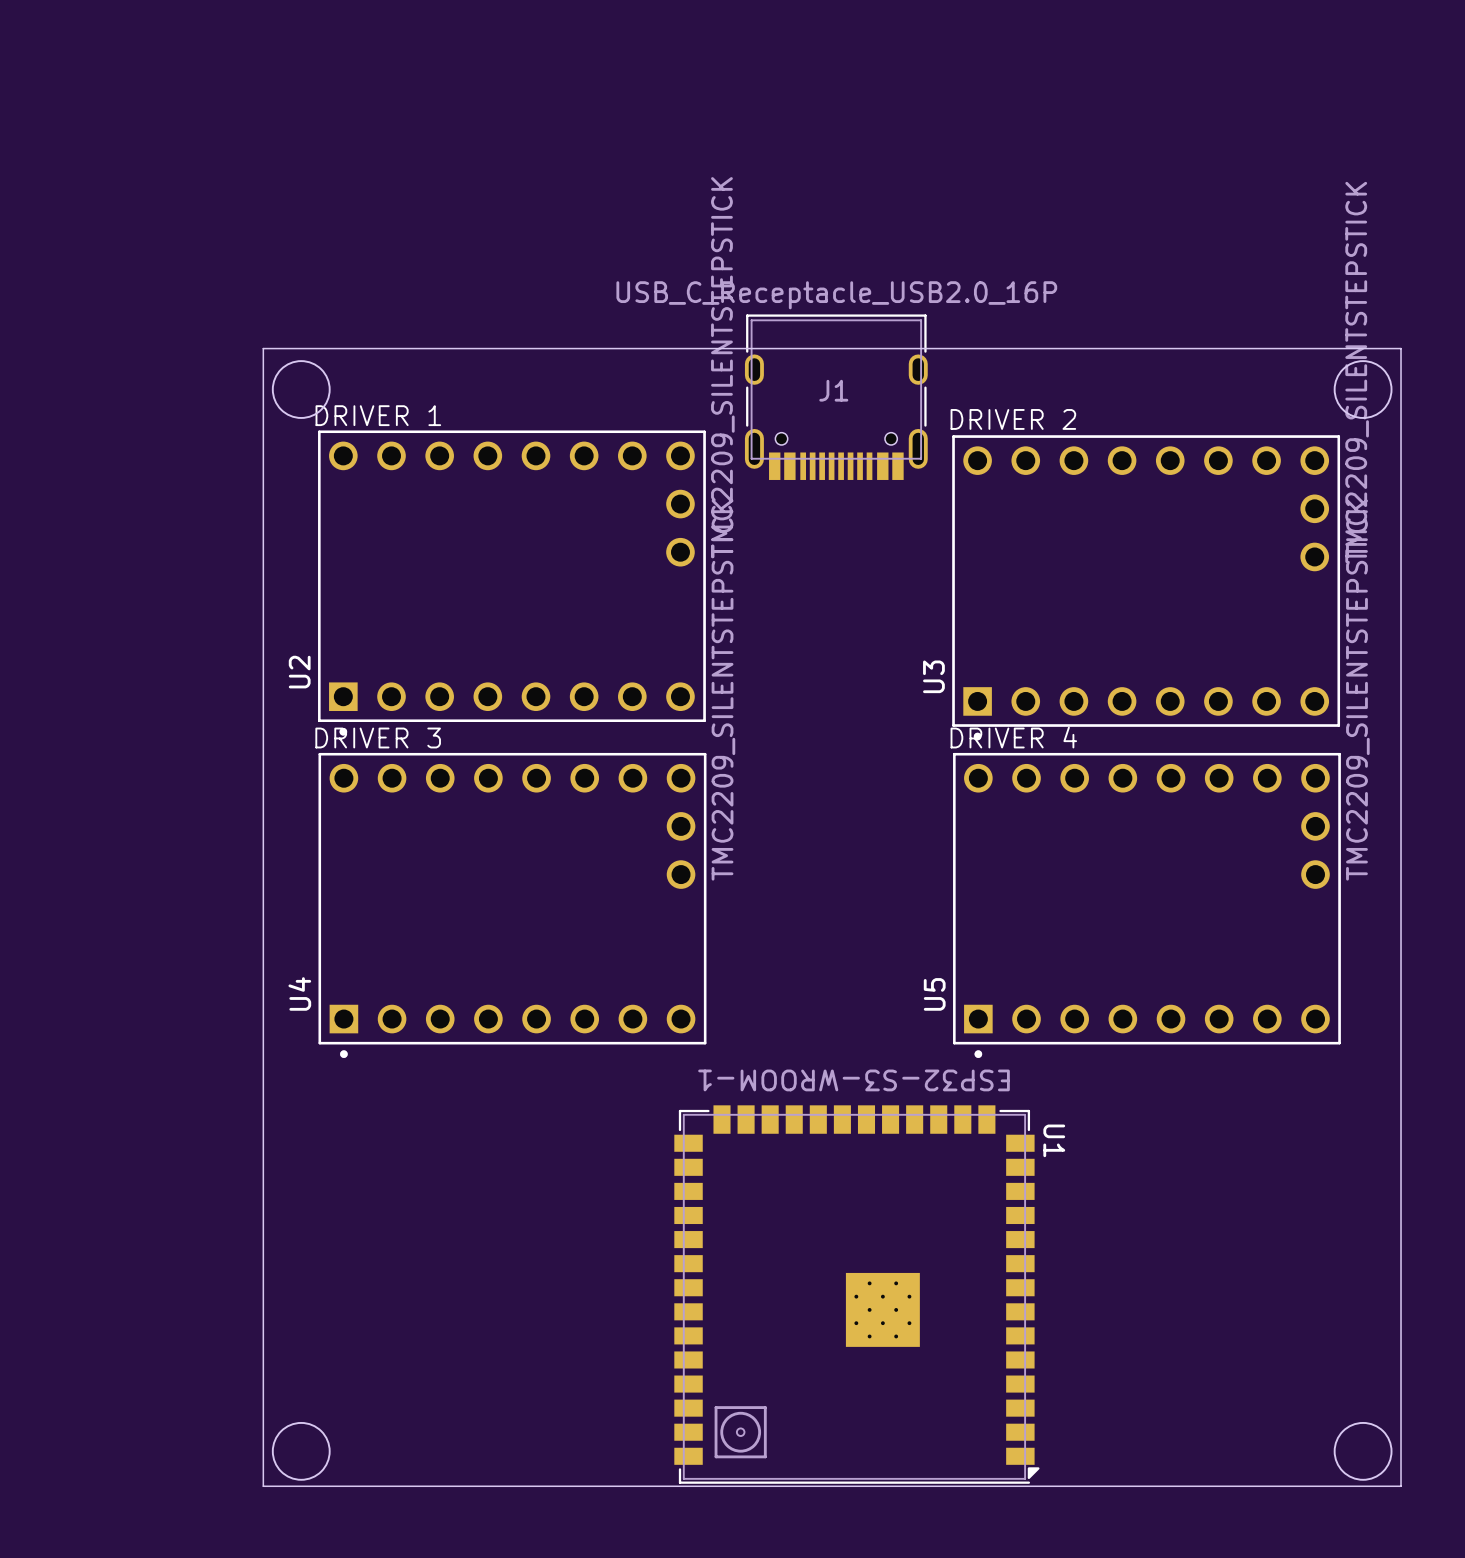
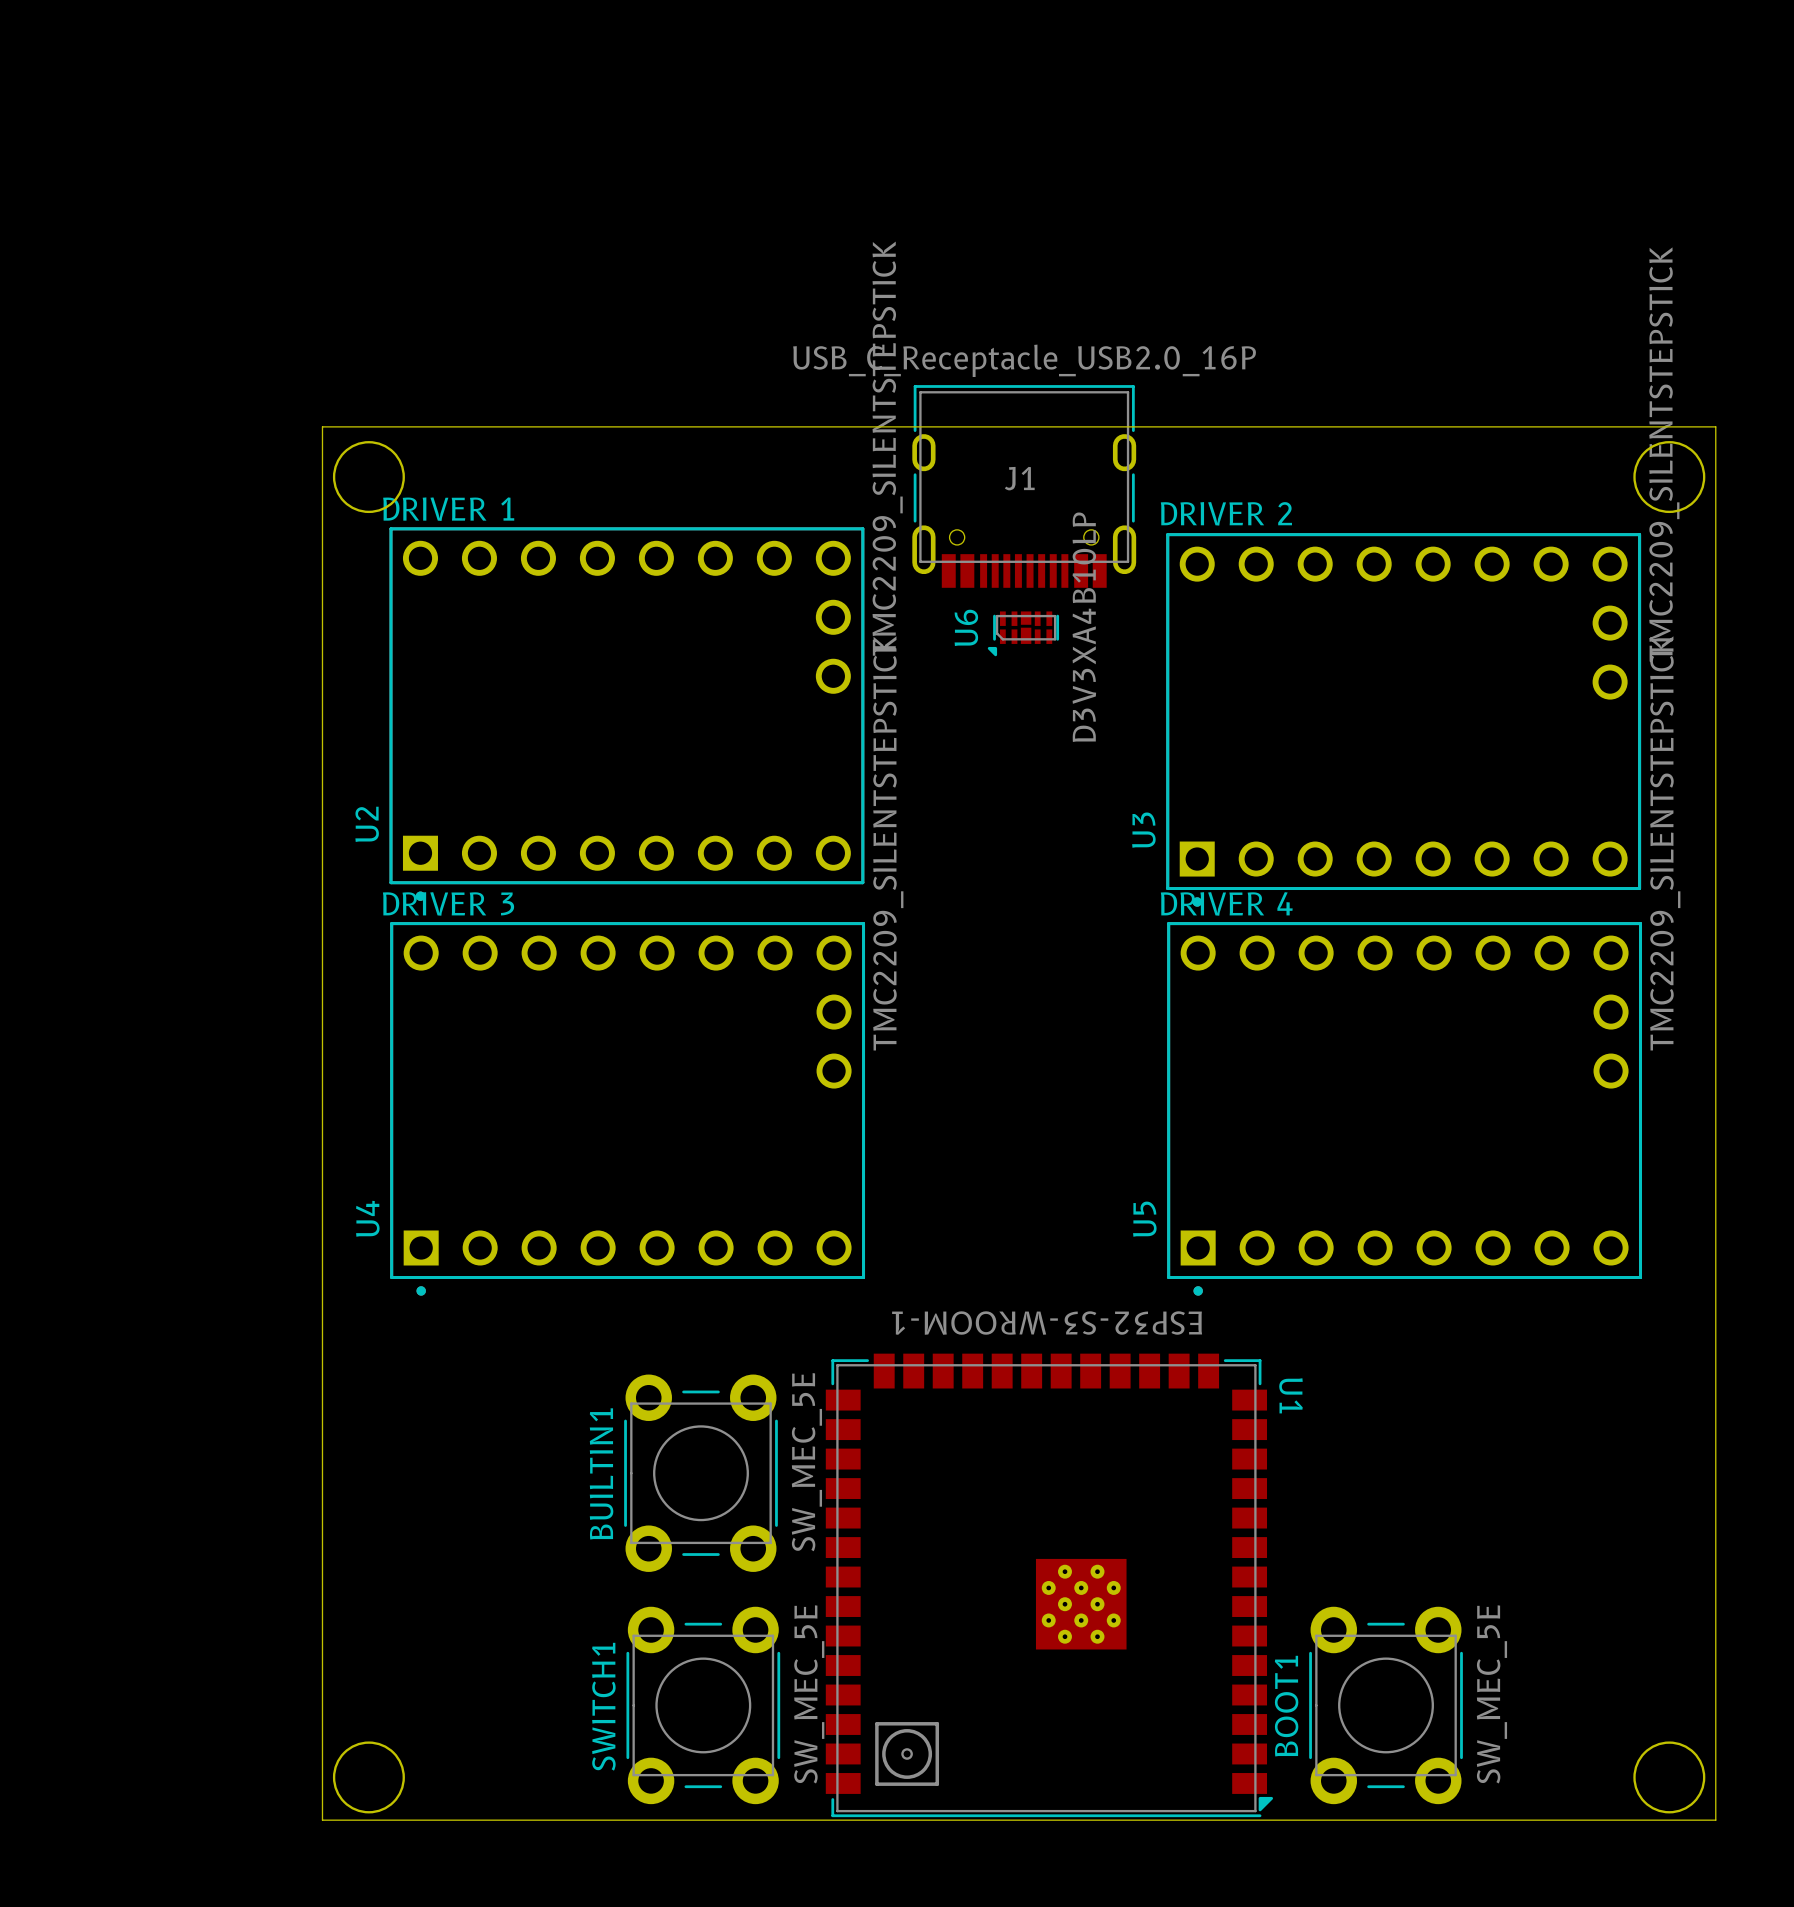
U6: none -> D3V3XA4B10LP (1023, 633)
BUILTIN1: none -> SW_MEC_5E (700, 1473)
SWITCH1: none -> SW_MEC_5E (703, 1705)
BOOT1: none -> SW_MEC_5E (1386, 1705)

